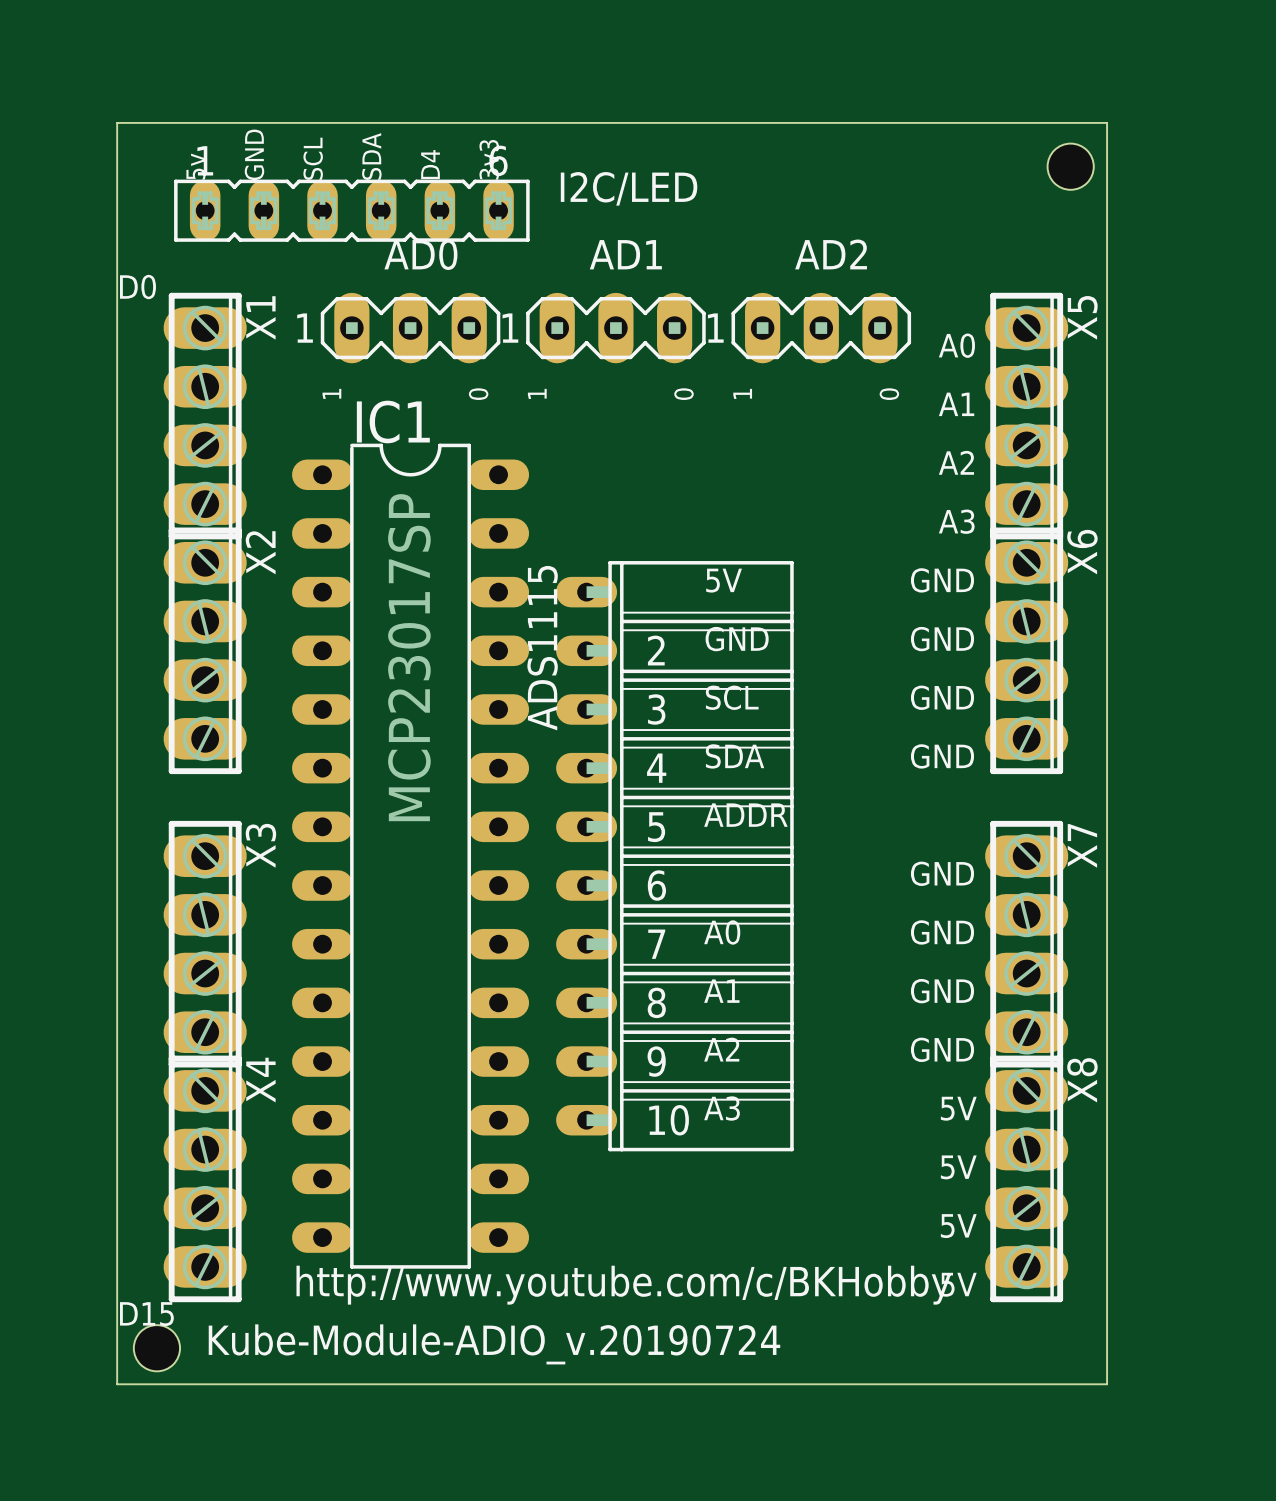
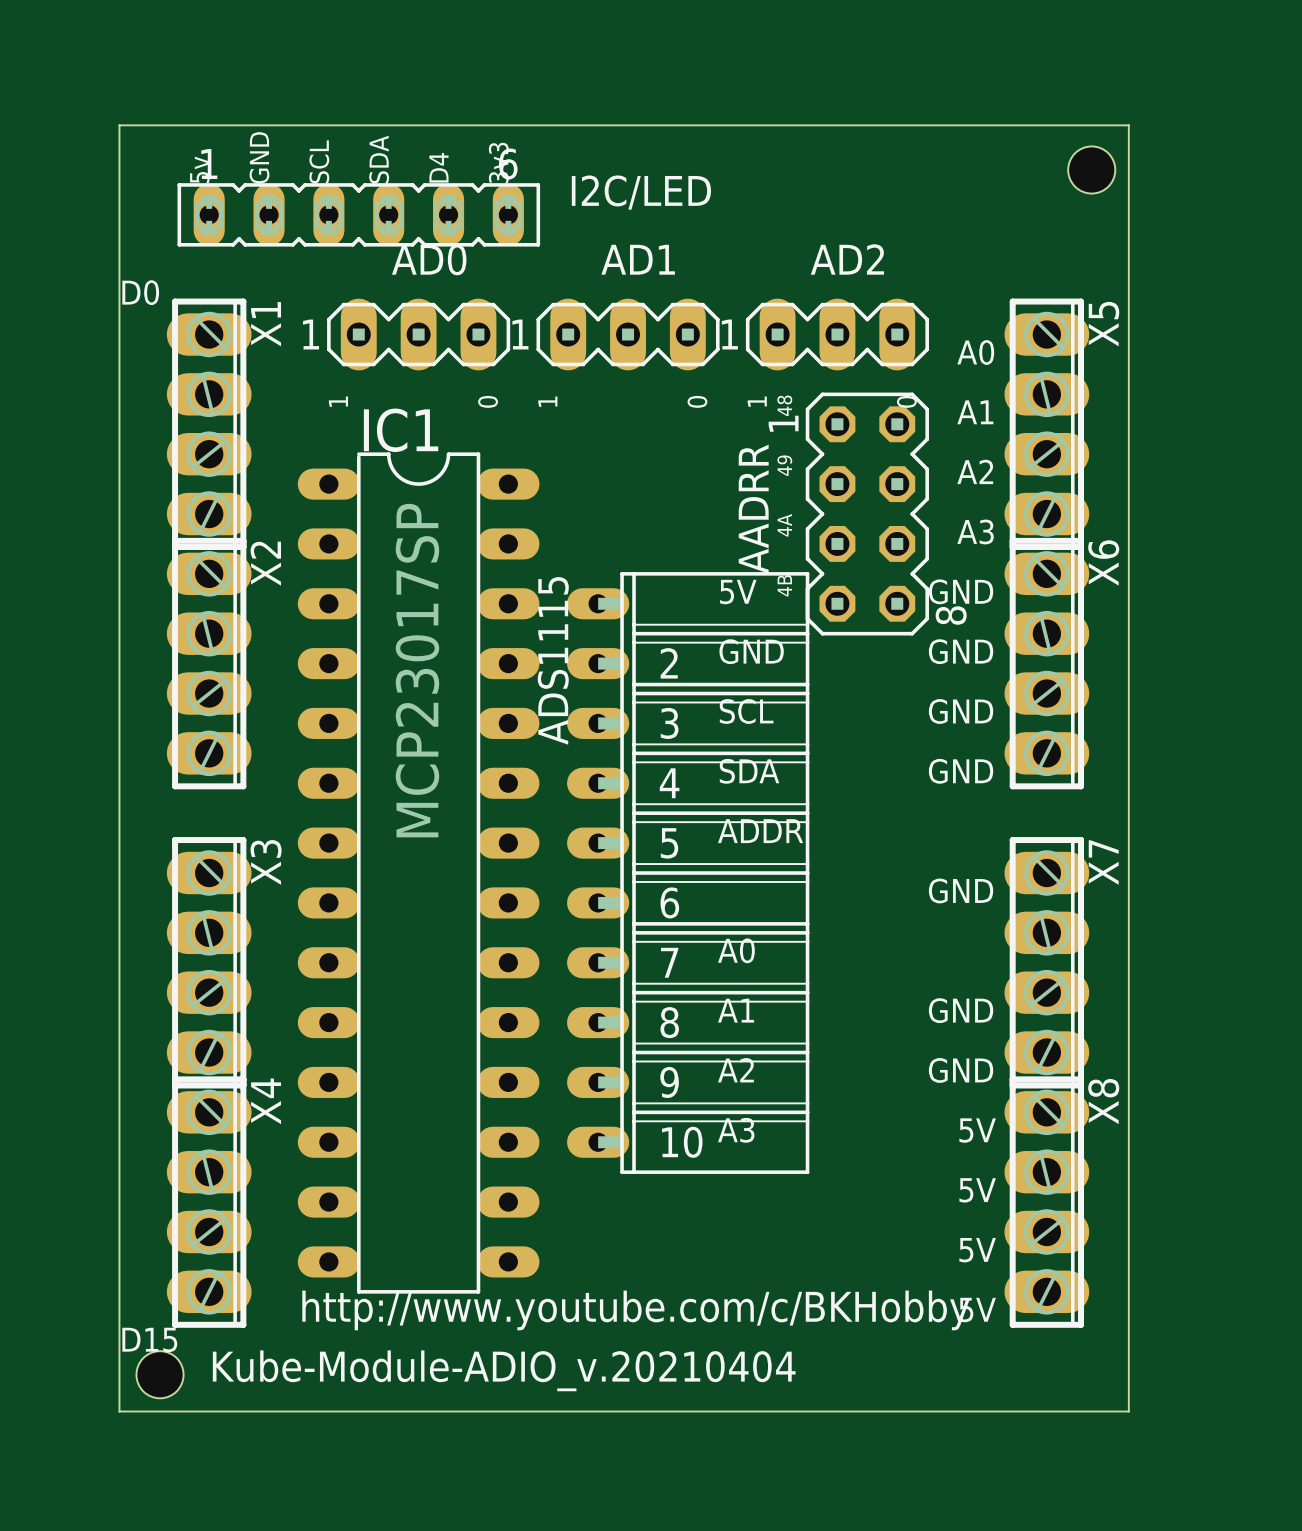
text: none -> 48 (784, 405)
text: none -> 49 (784, 465)
AADRR: none -> (867, 514)
text: none -> 4A (784, 525)
text: none -> 4B (784, 585)
text: GND (942, 932) -> none
text: Kube-Module-ADIO_v.20190724 (494, 1344) -> Kube-Module-ADIO_v.20210404 (504, 1370)

